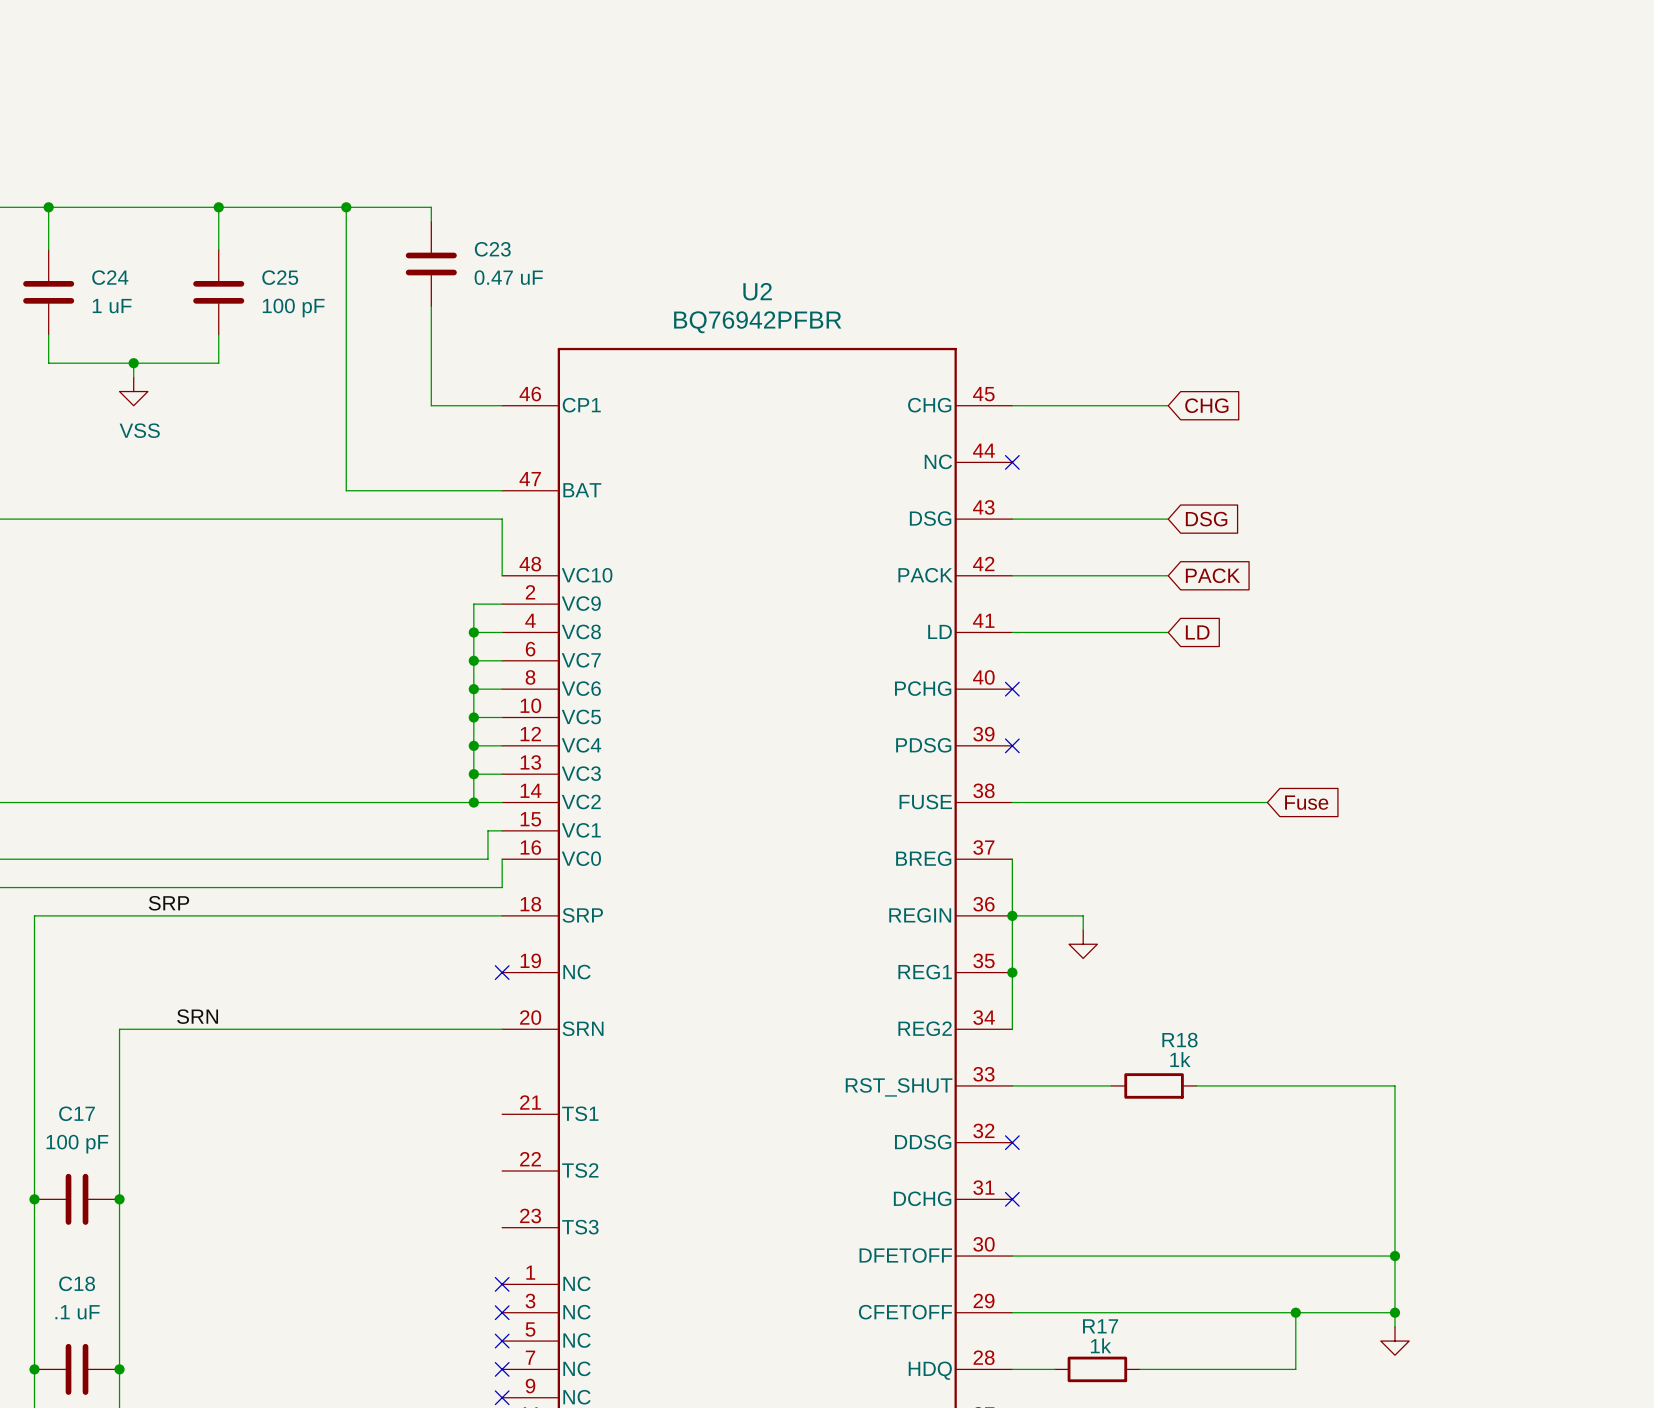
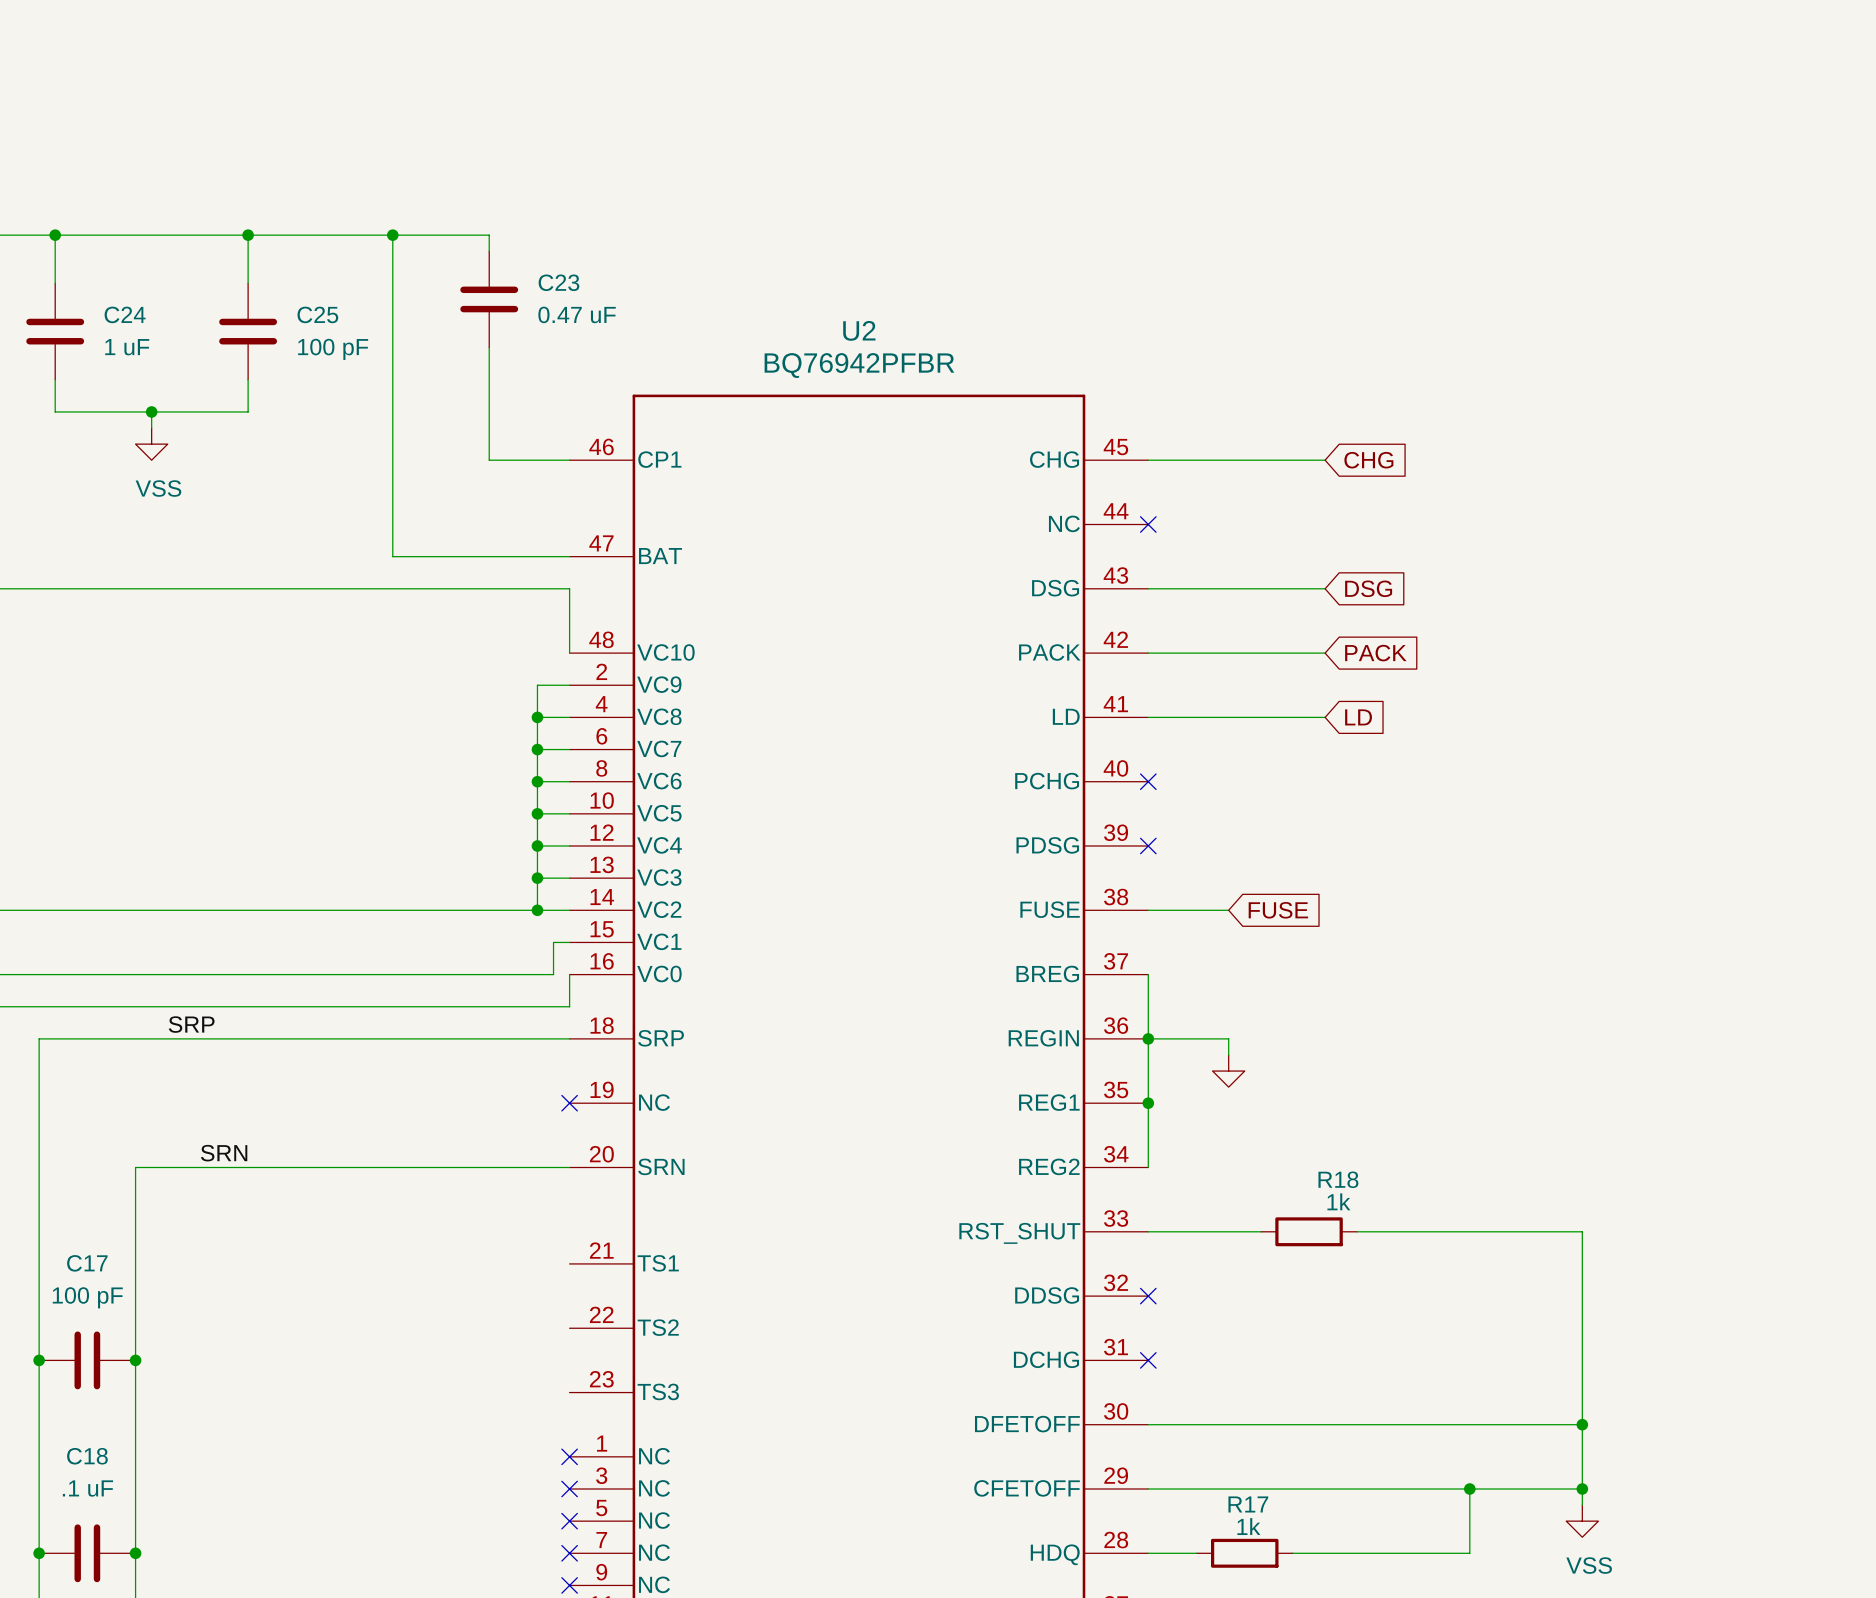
wire: (1083, 802) (1267, 802) -> none
global label: none -> FUSE (1278, 910)
global label: Fuse (1306, 802) -> none
power symbol text: none -> VSS (1589, 1565)

